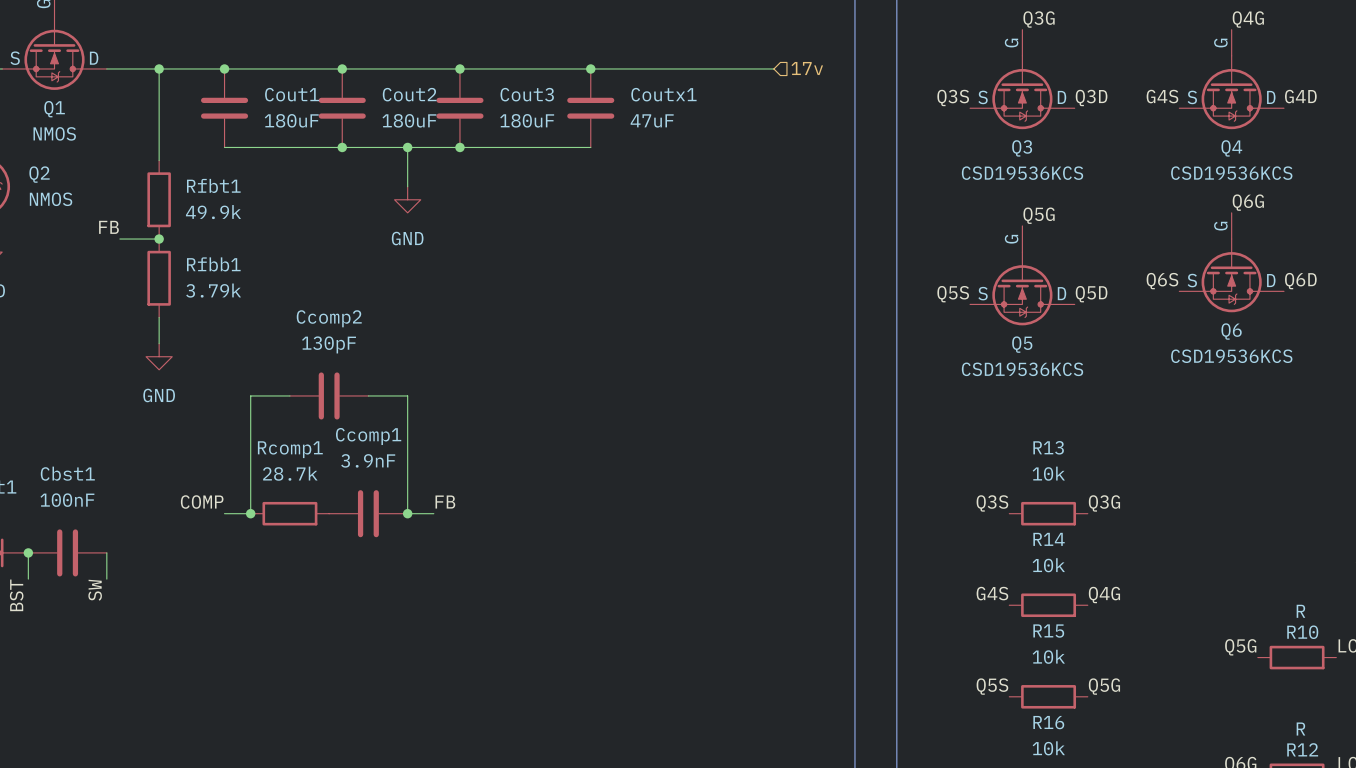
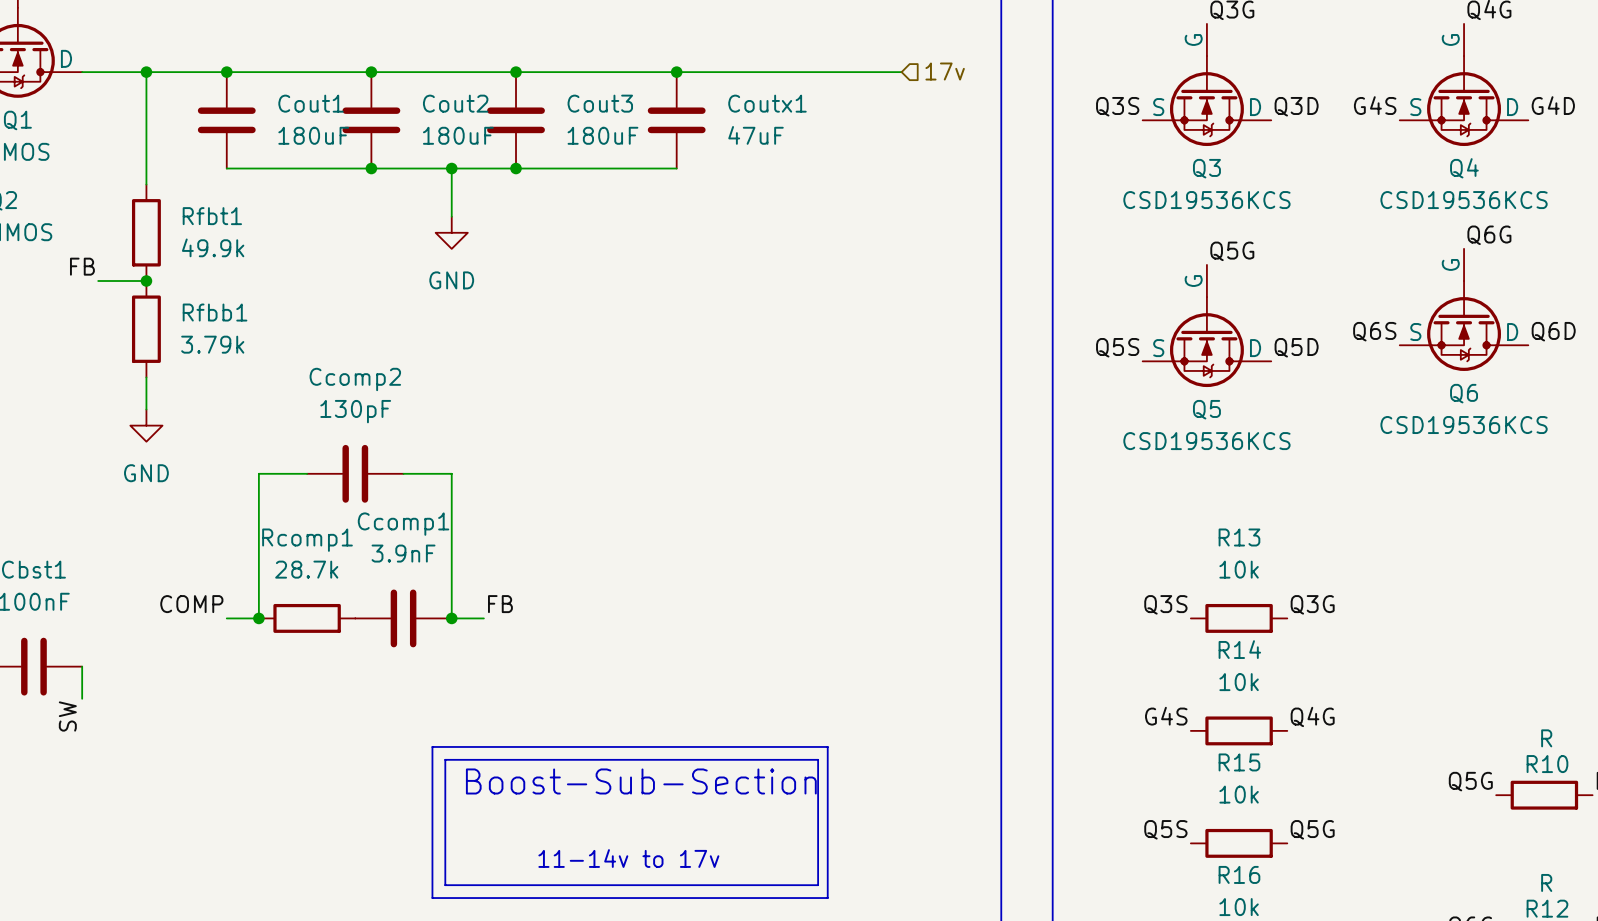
line: none -> (432, 746) (827, 746) (827, 898) (432, 898) (432, 746)
line: none -> (445, 759) (818, 759) (818, 885) (445, 885) (445, 759)
text: none -> Boost-Sub-Section (641, 781)
text: none -> 11-14v to 17v (628, 858)

